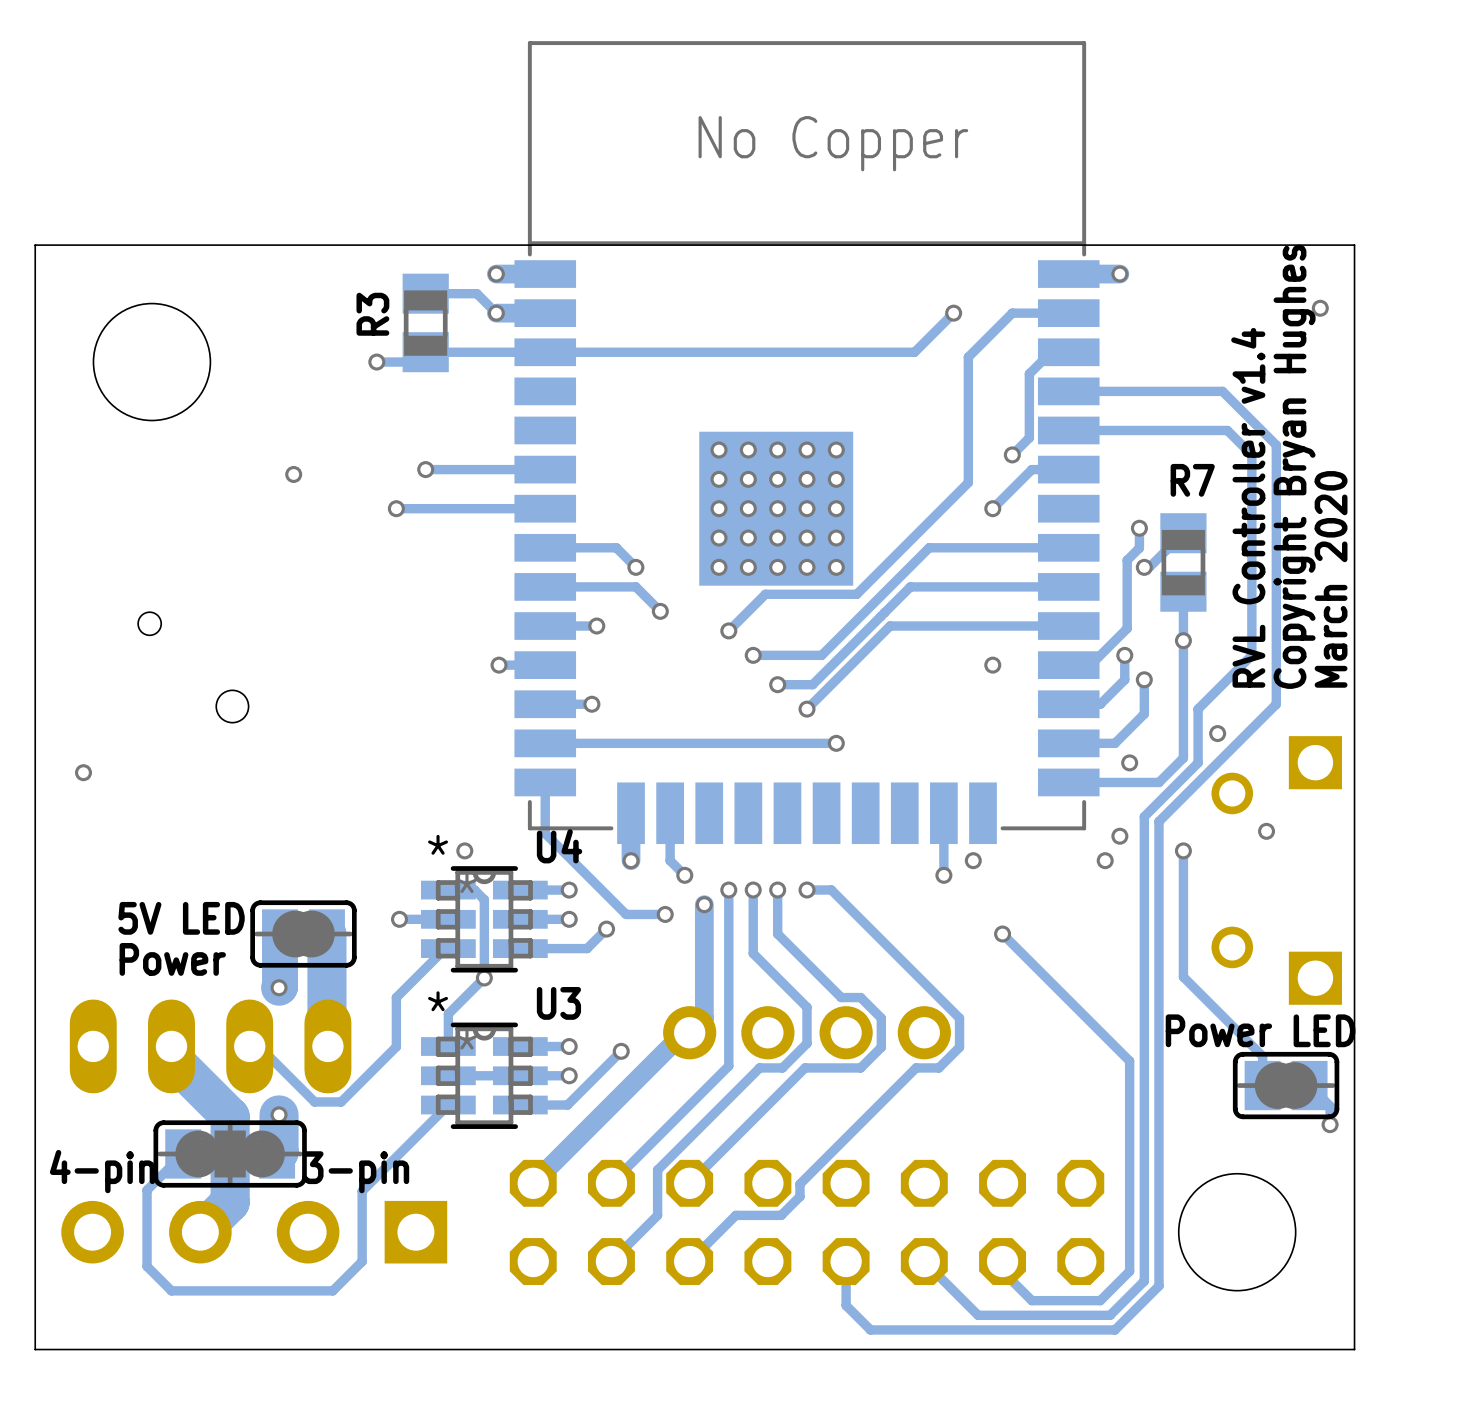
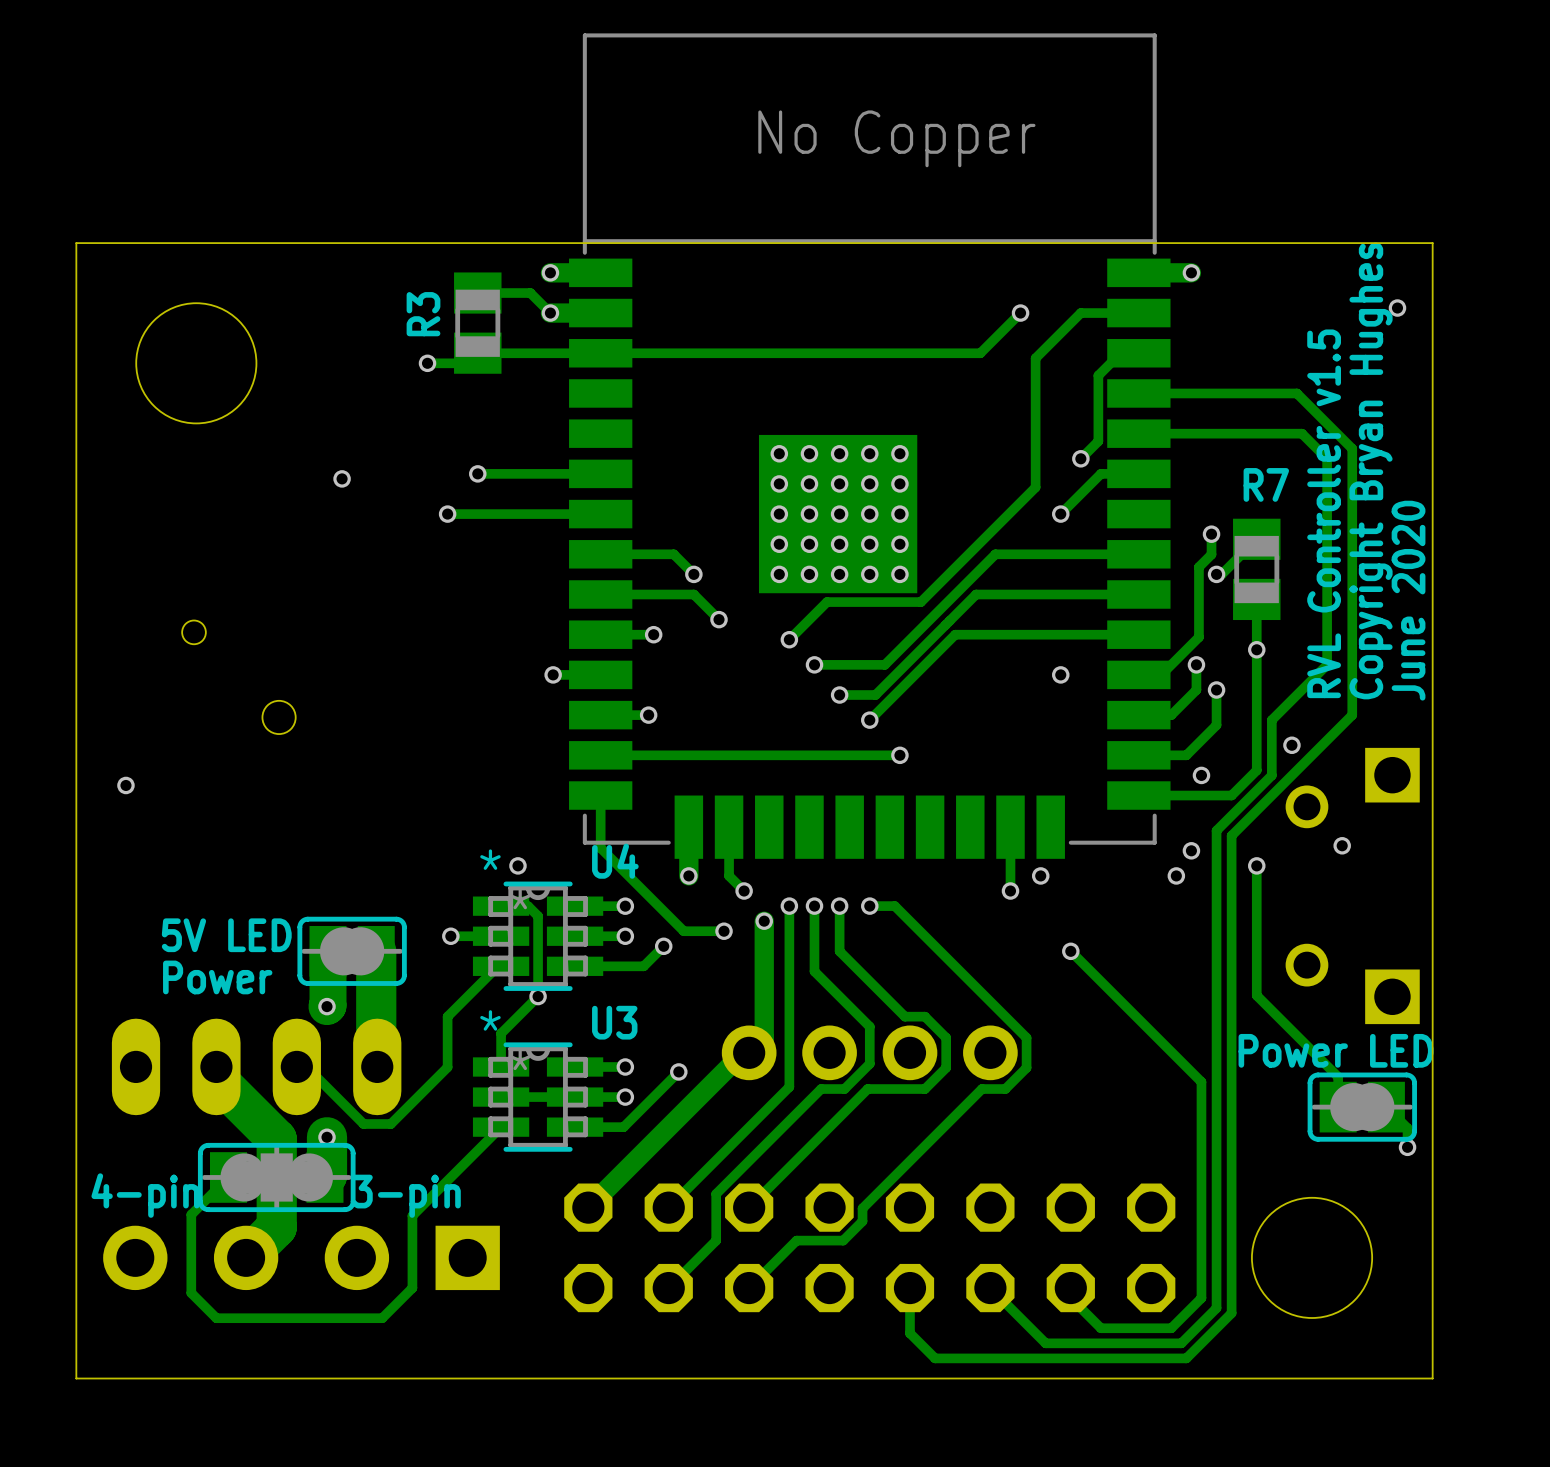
text: RVL Controller v1.4 (1248, 507) -> RVL Controller v1.5 (1324, 513)
text: March 2020 (1331, 579) -> June 2020 (1408, 600)

